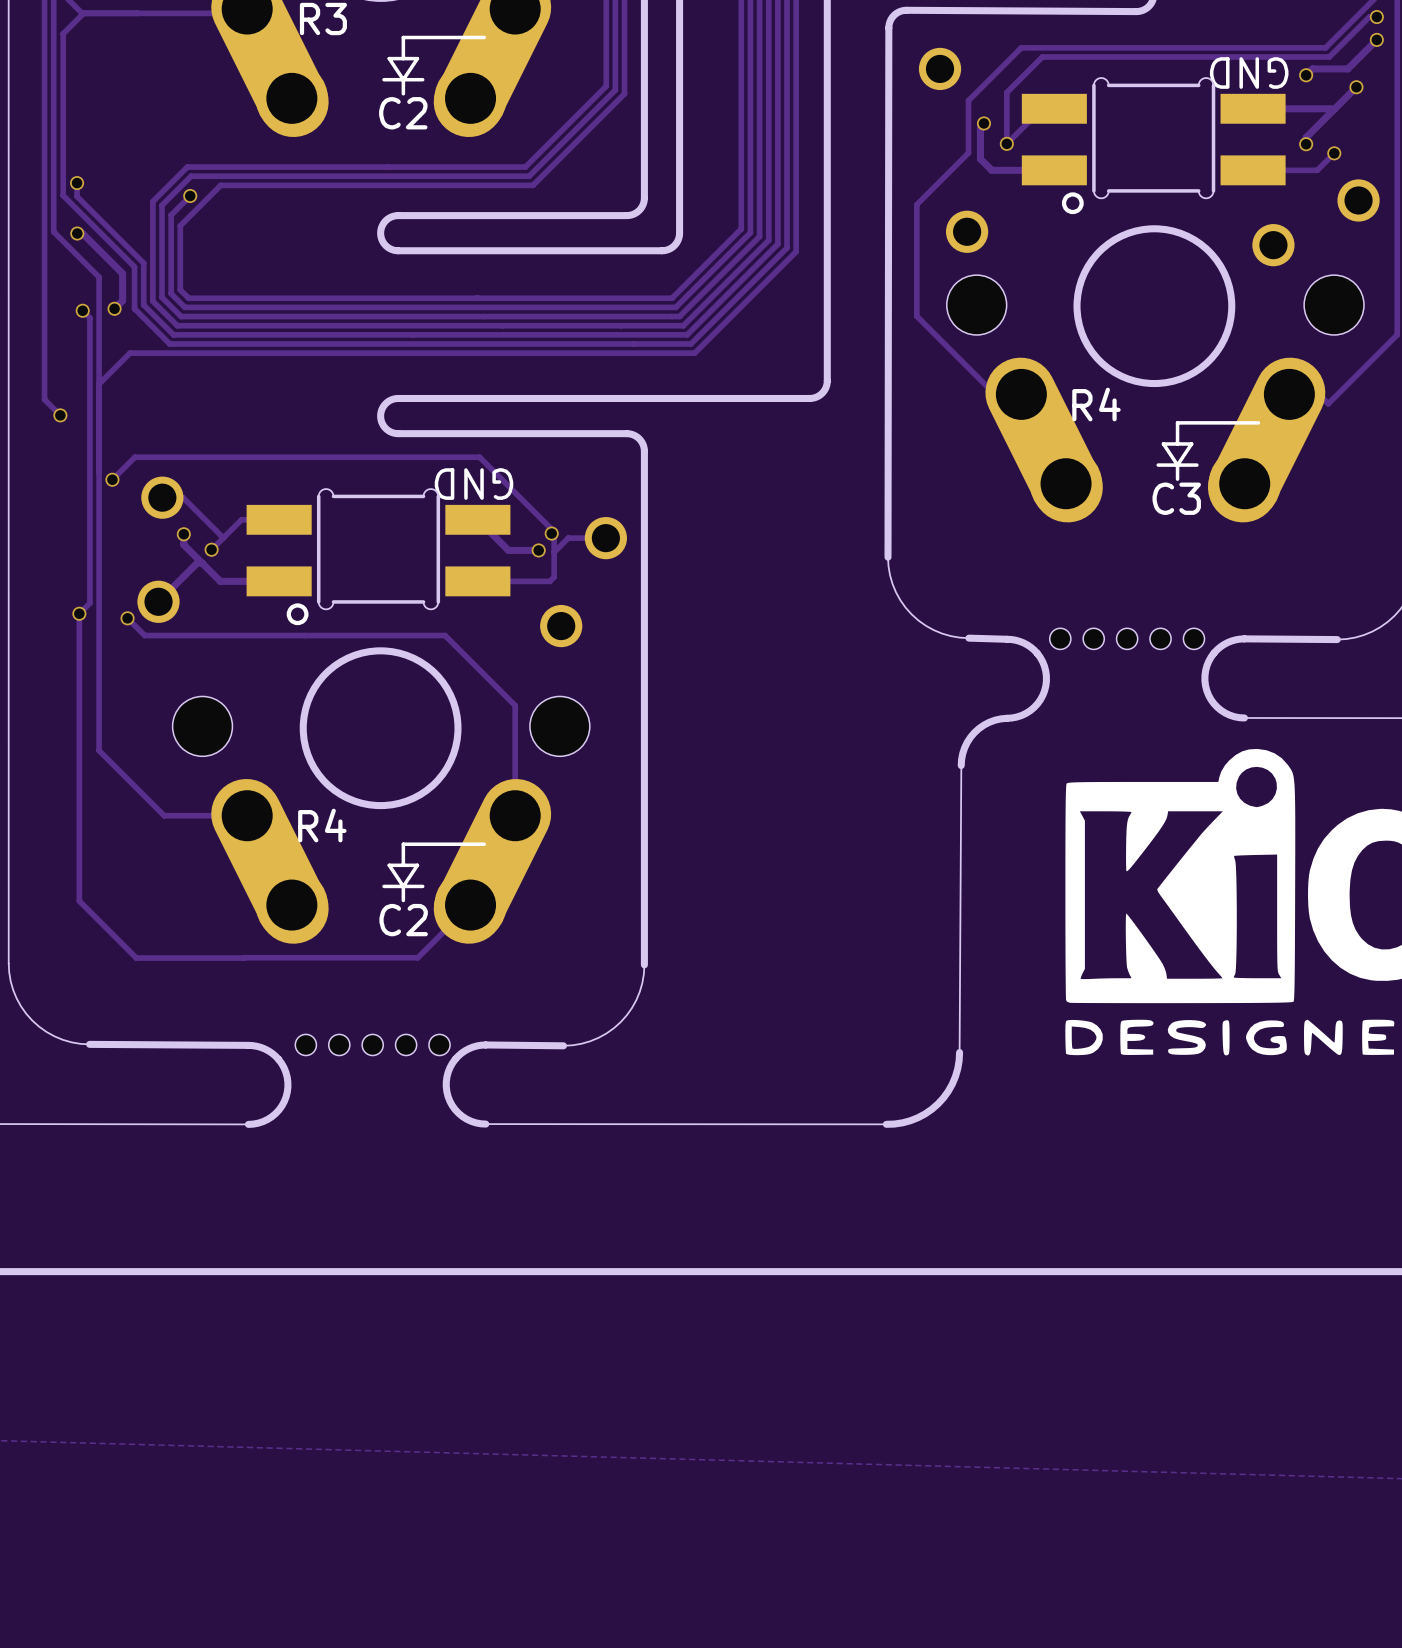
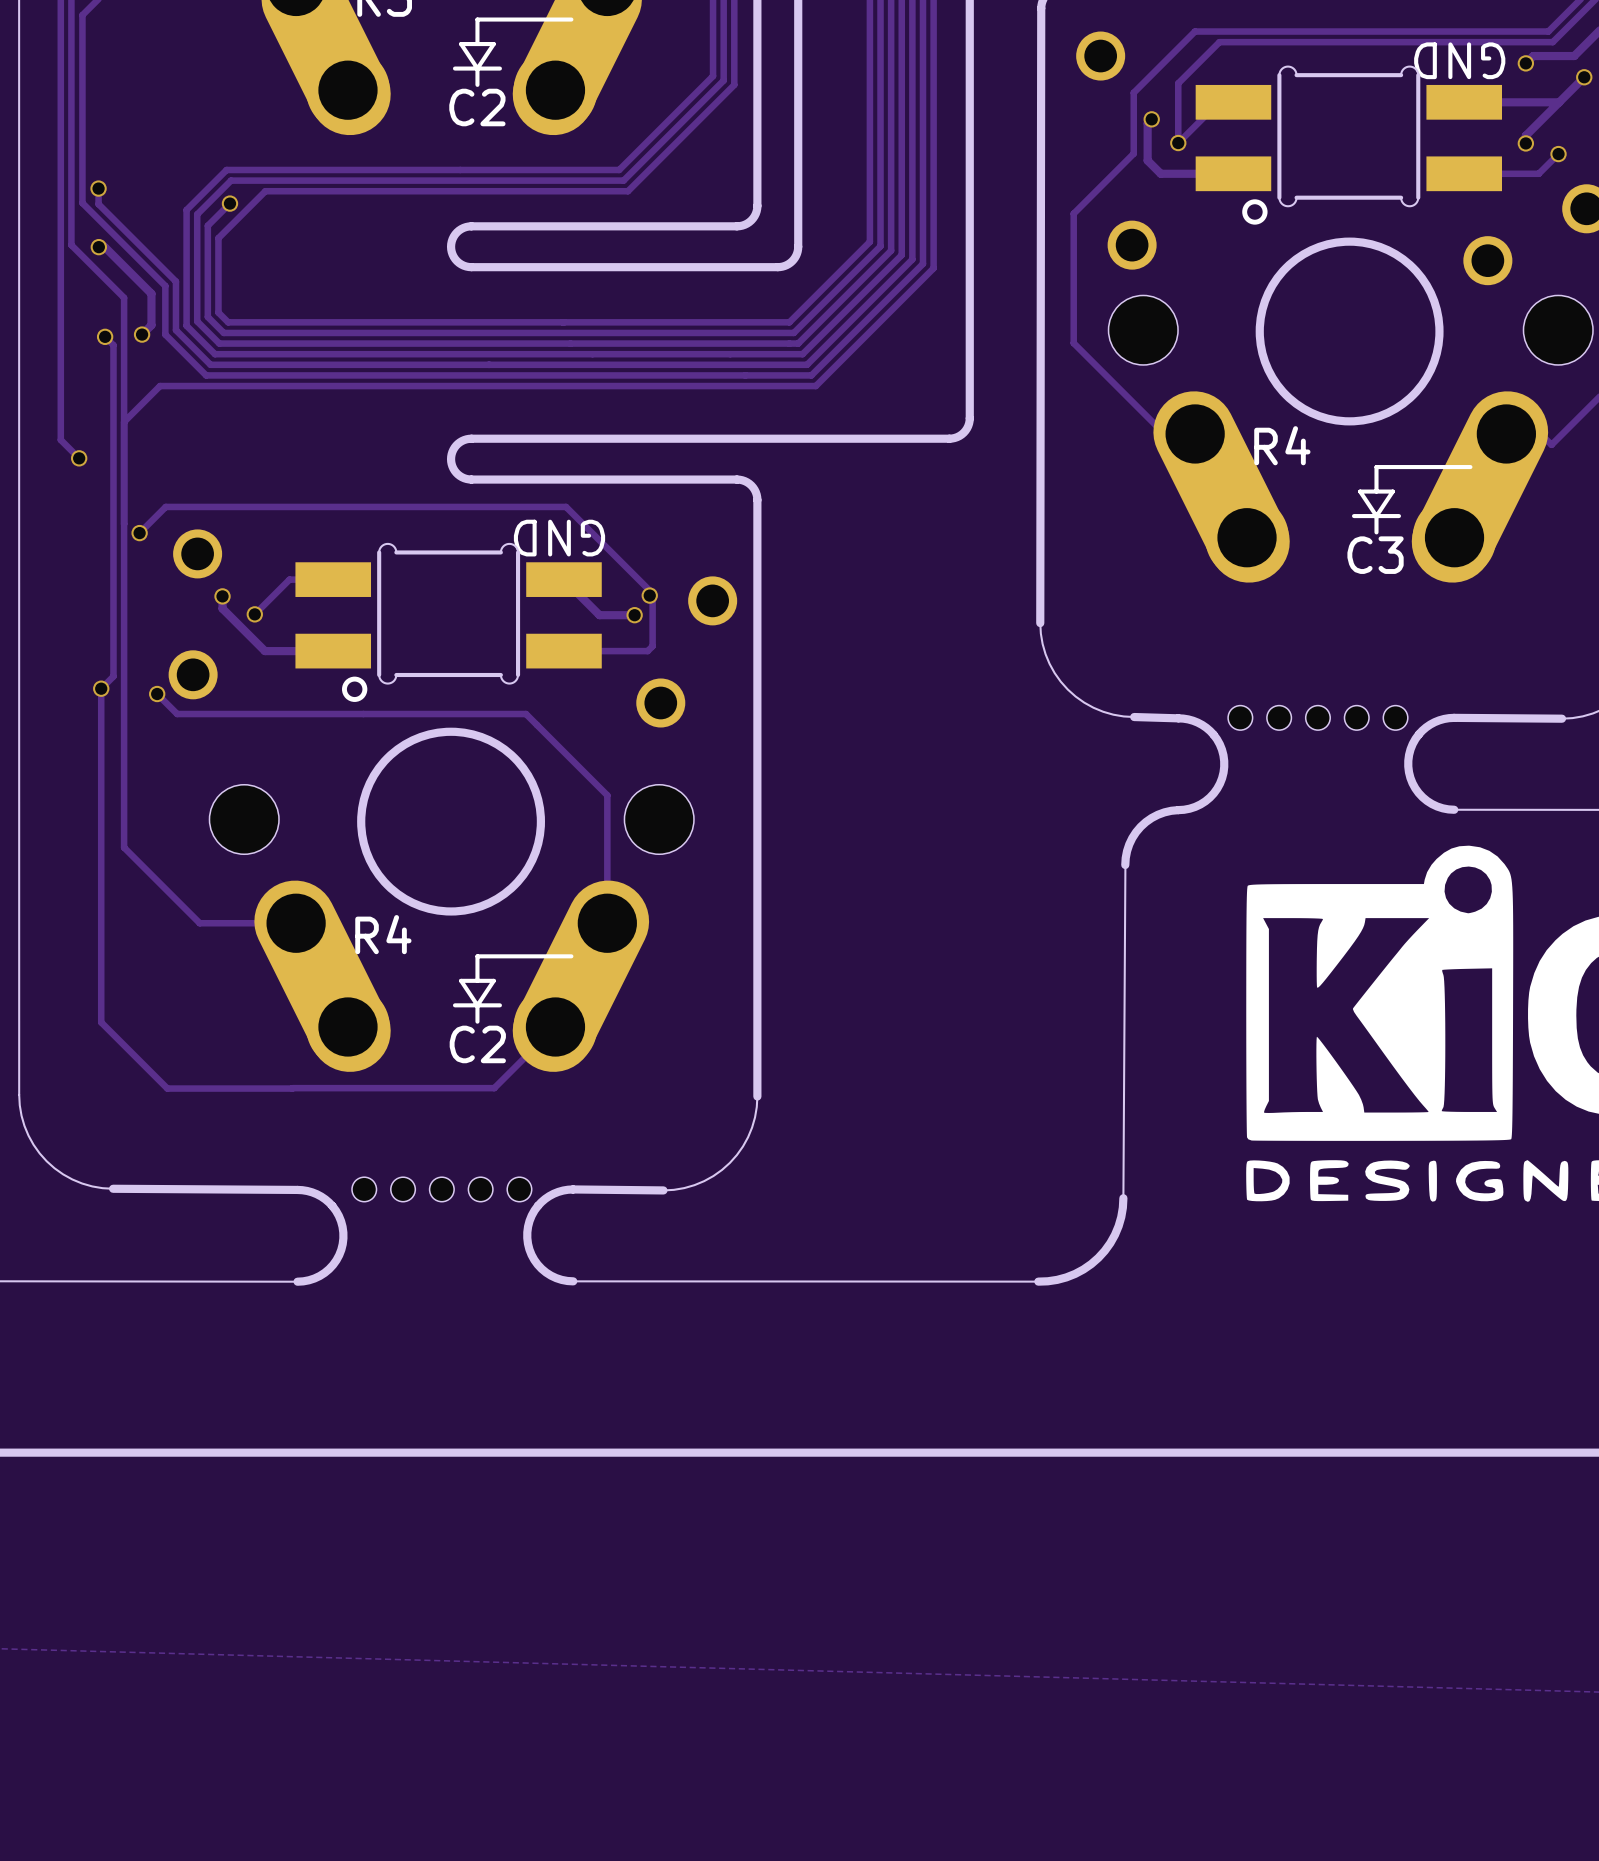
track: (162, 497) (183, 497) (223, 537) -> none
track: (605, 538) (568, 538) (554, 552) -> none
track: (202, 563) (197, 563) (158, 601) -> none

